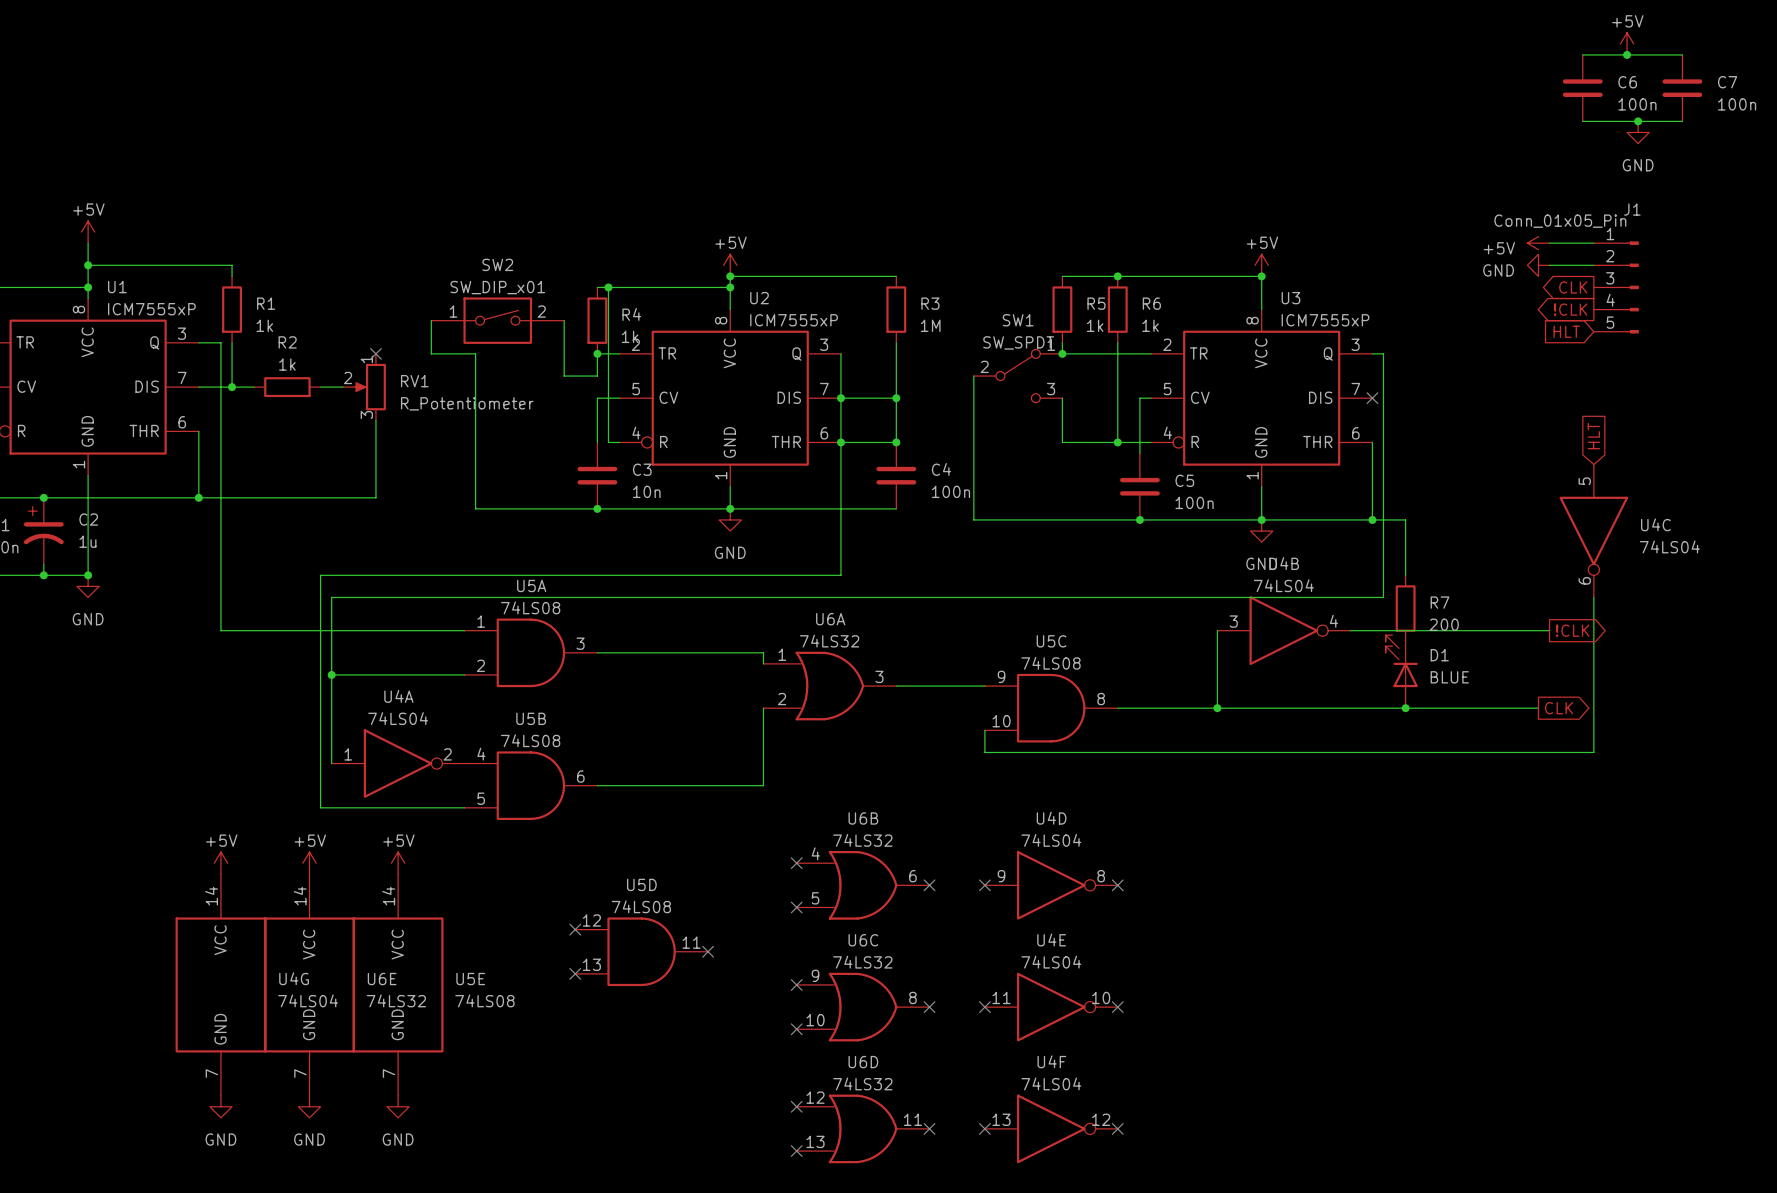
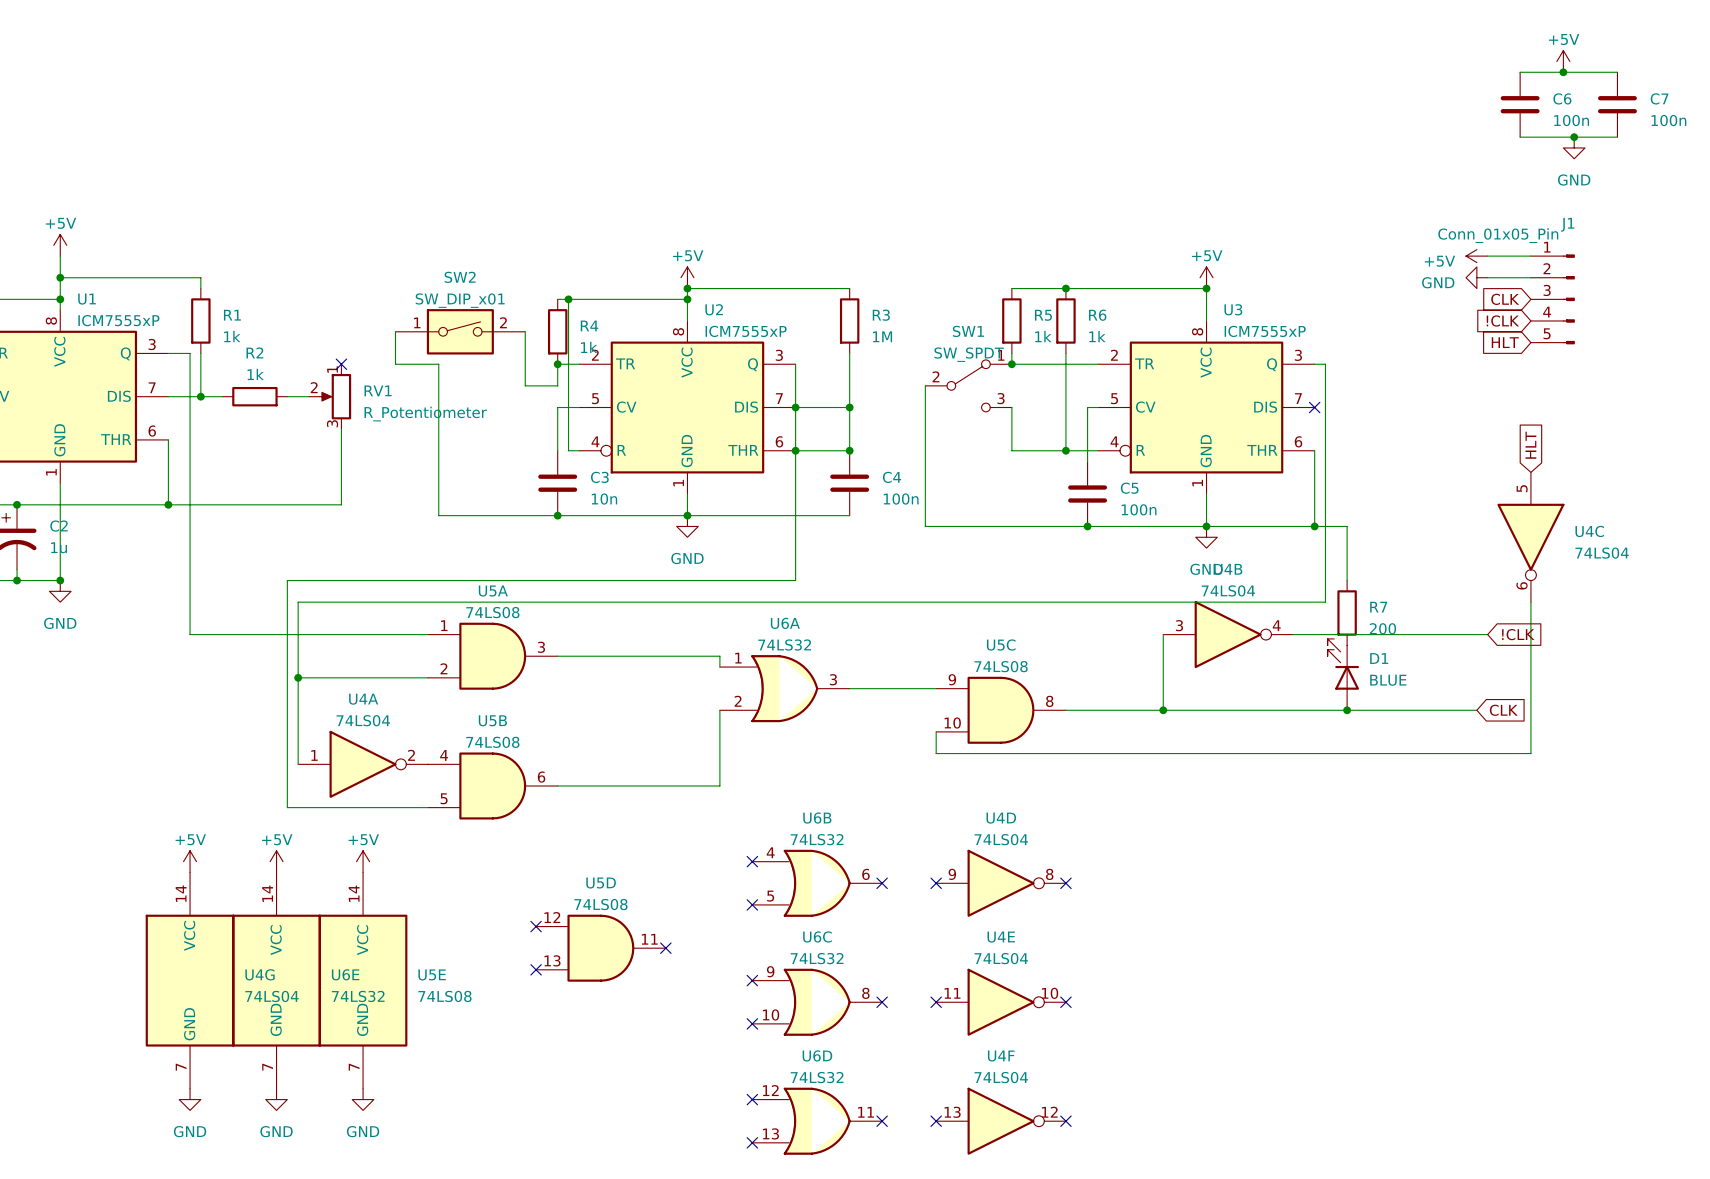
global label shape: output (1573, 287) -> input (1505, 299)
global label shape: output (1570, 309) -> input (1502, 321)
global label shape: output (1572, 630) -> input (1518, 634)
global label shape: output (1559, 708) -> input (1503, 710)

